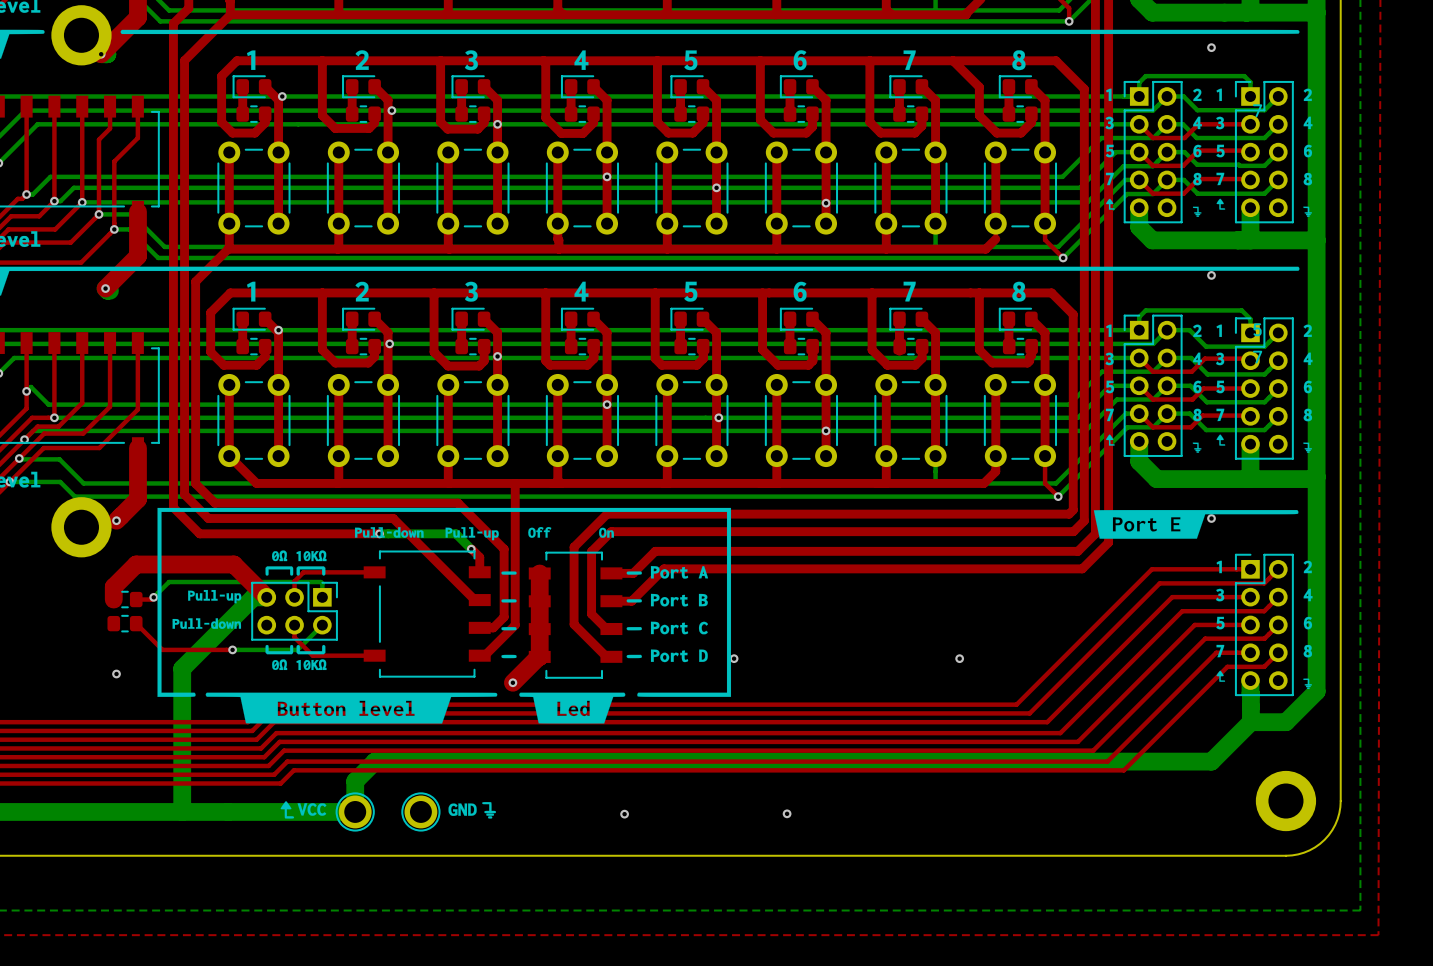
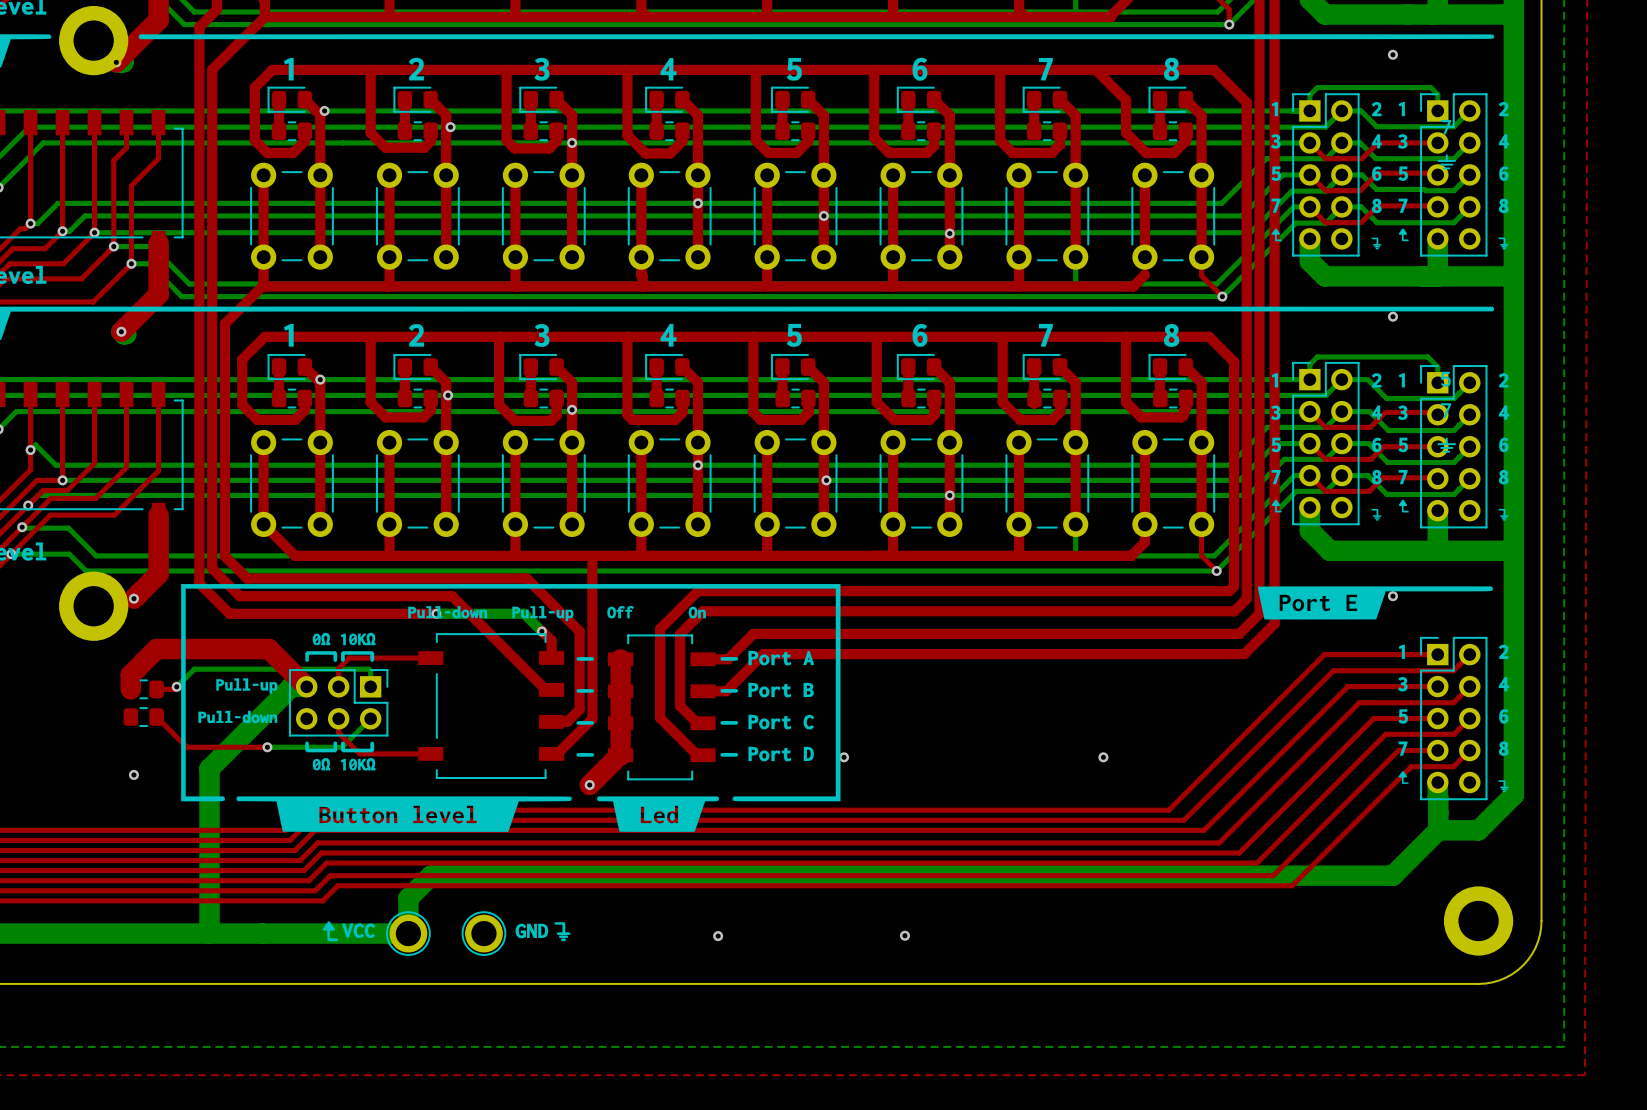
drawing: none -> [1437, 154, 1456, 170]
drawing: none -> [1437, 437, 1456, 453]

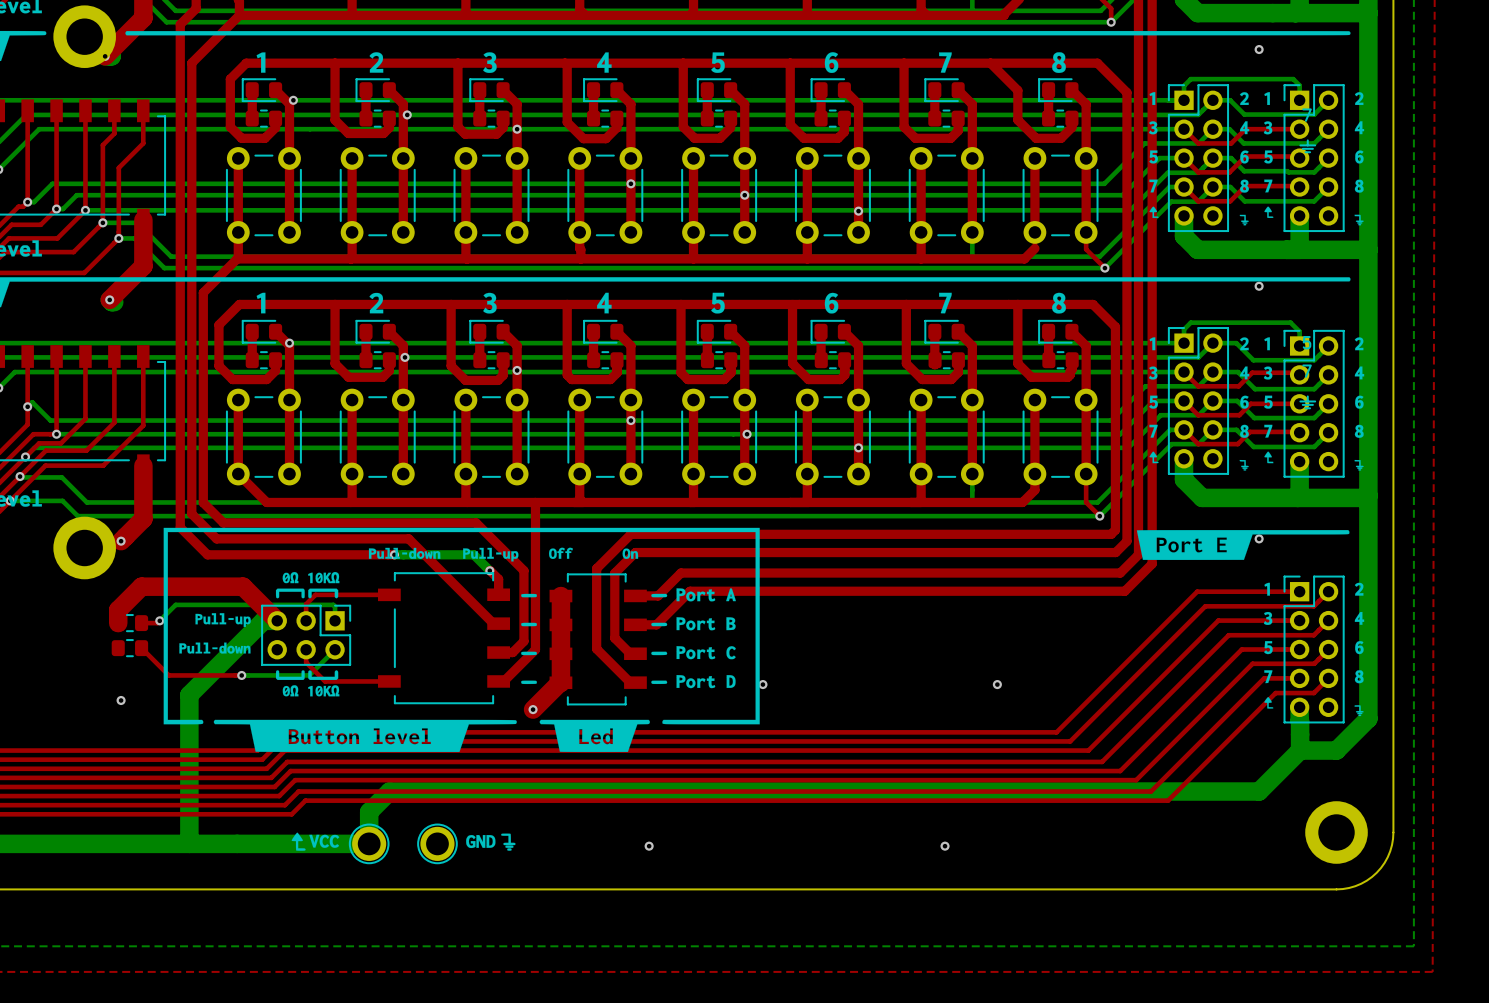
via: (904, 935) -> none
via: none -> (945, 846)

